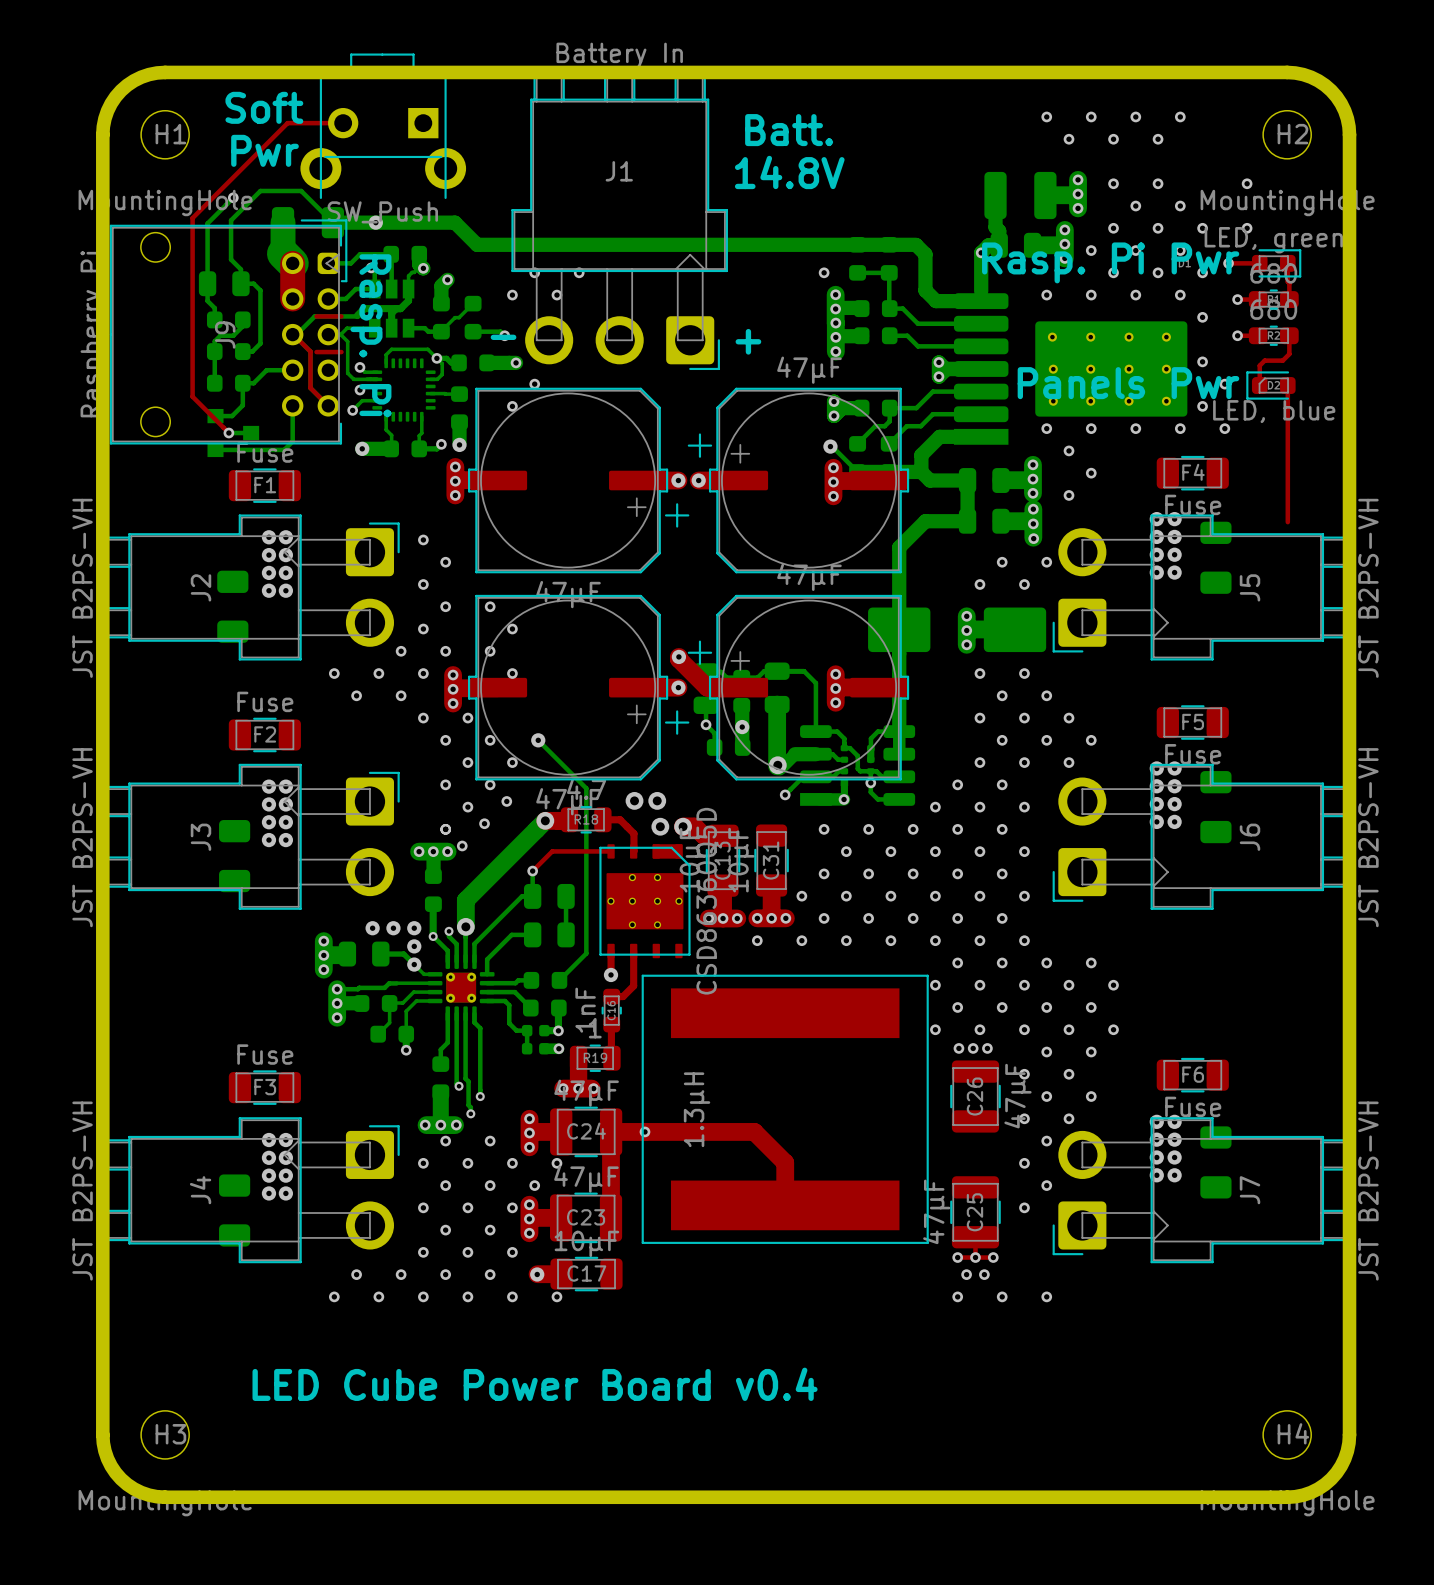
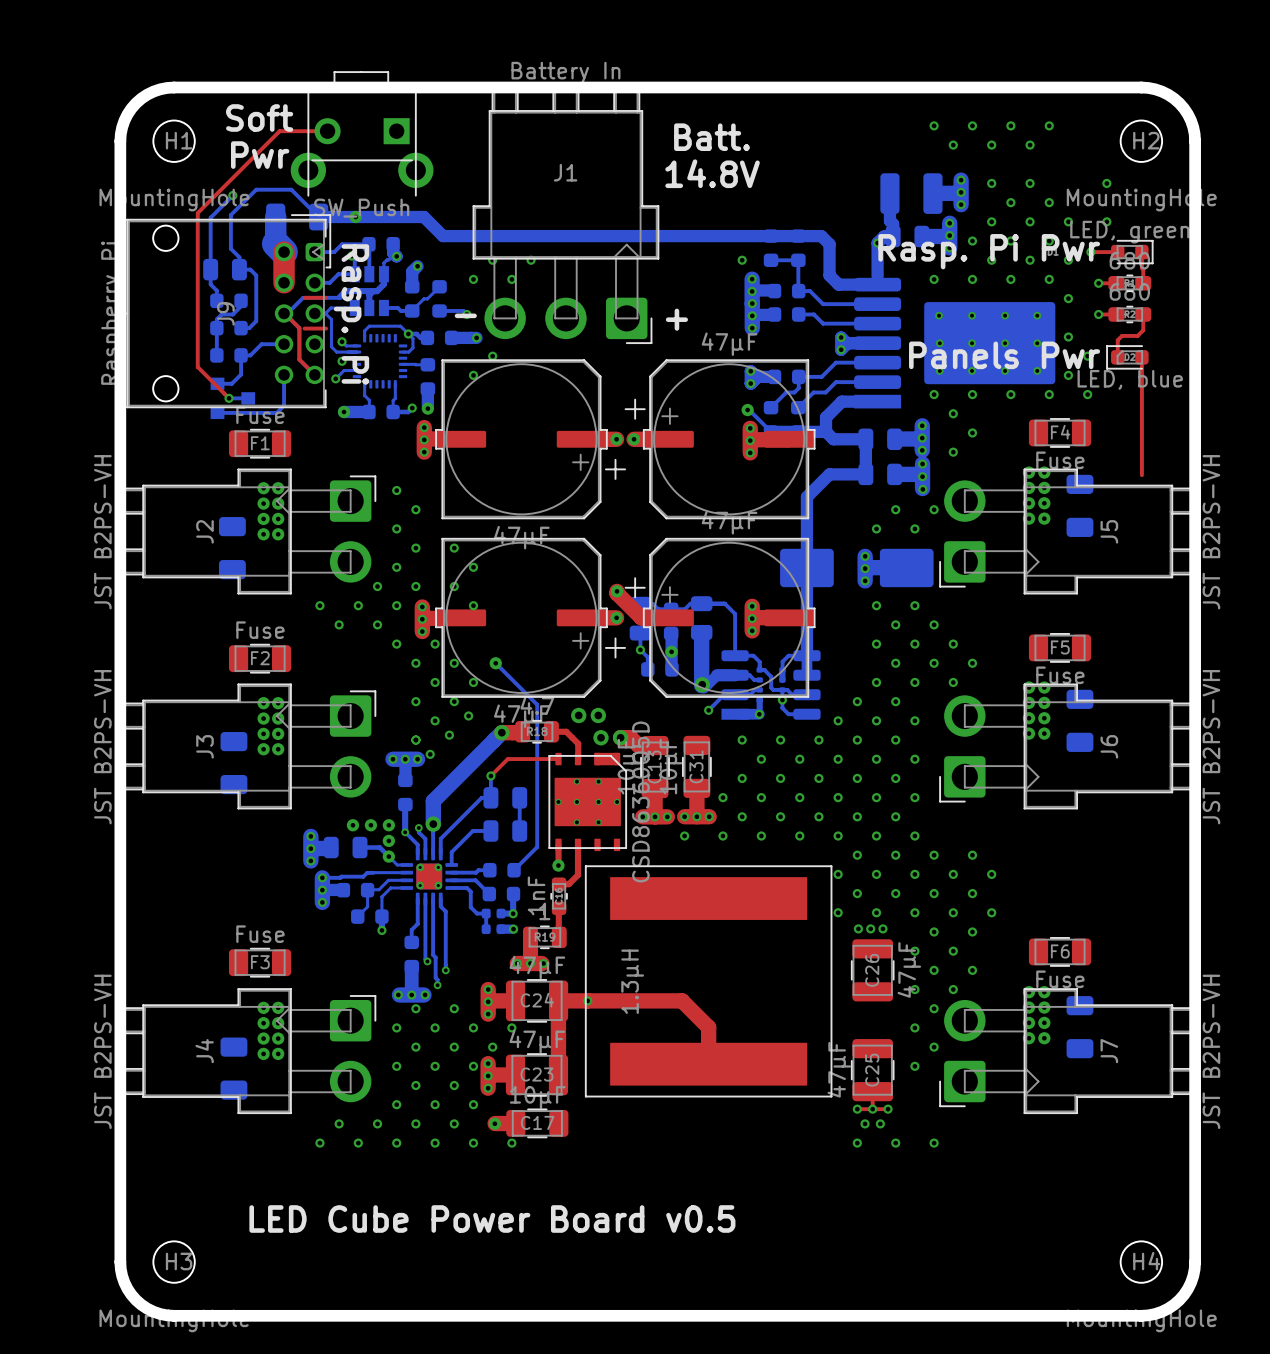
text: LED Cube Power Board v0.4 (535, 1384) -> LED Cube Power Board v0.5 (492, 1218)

